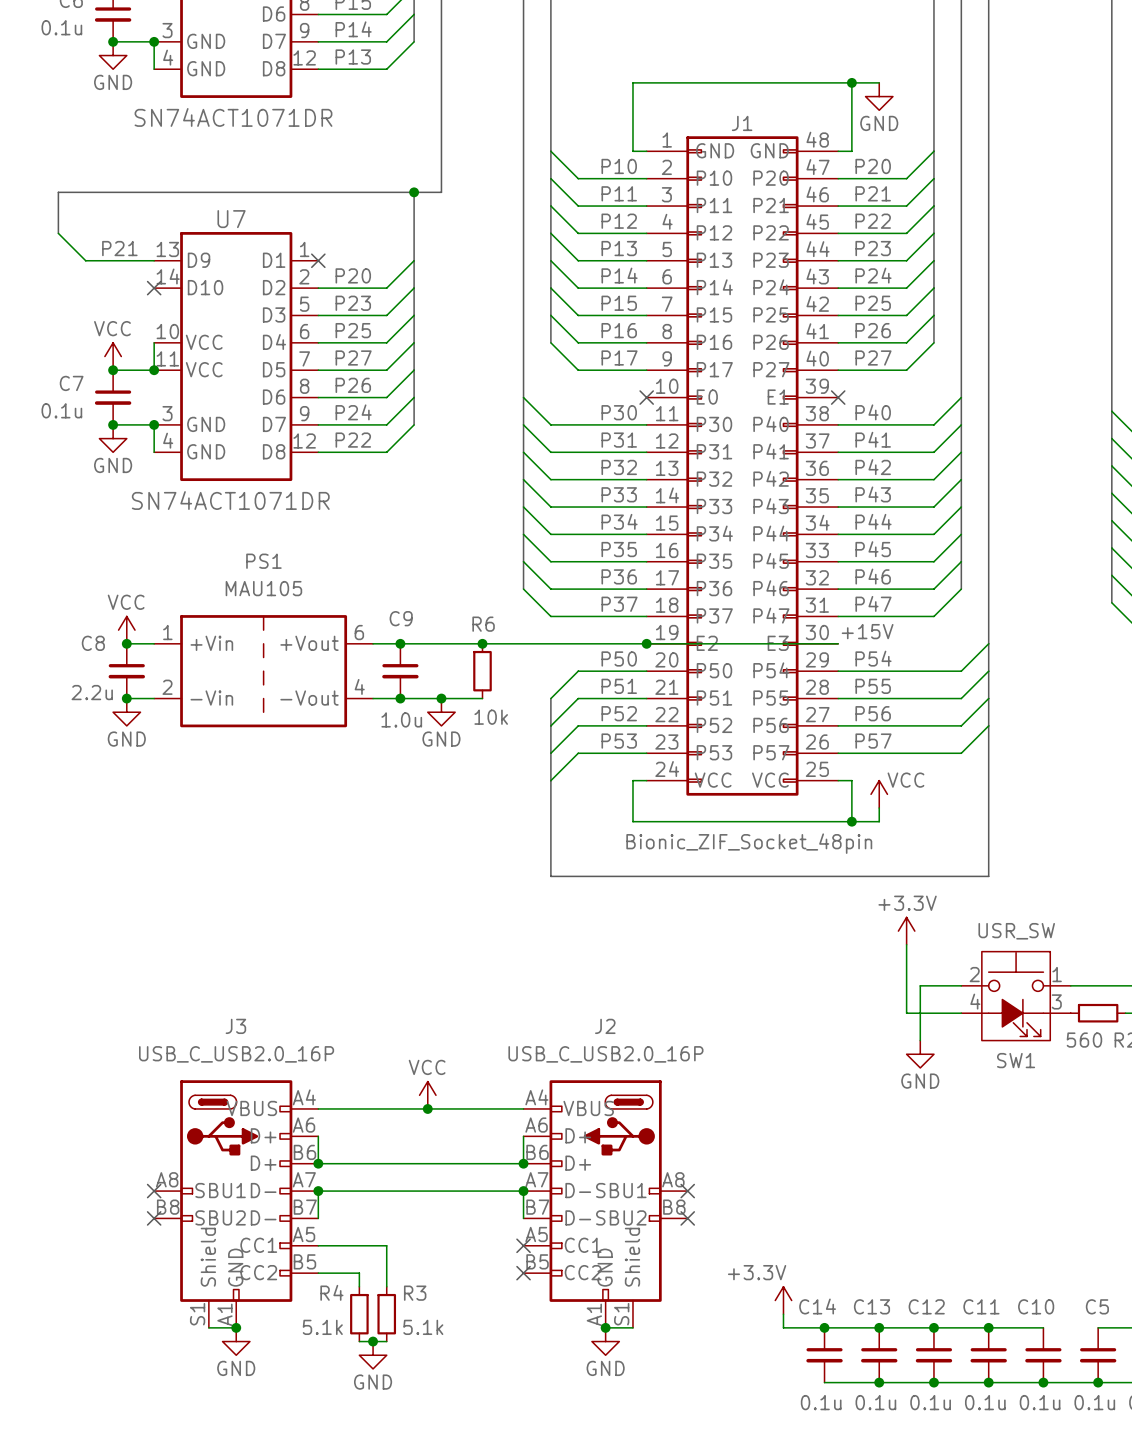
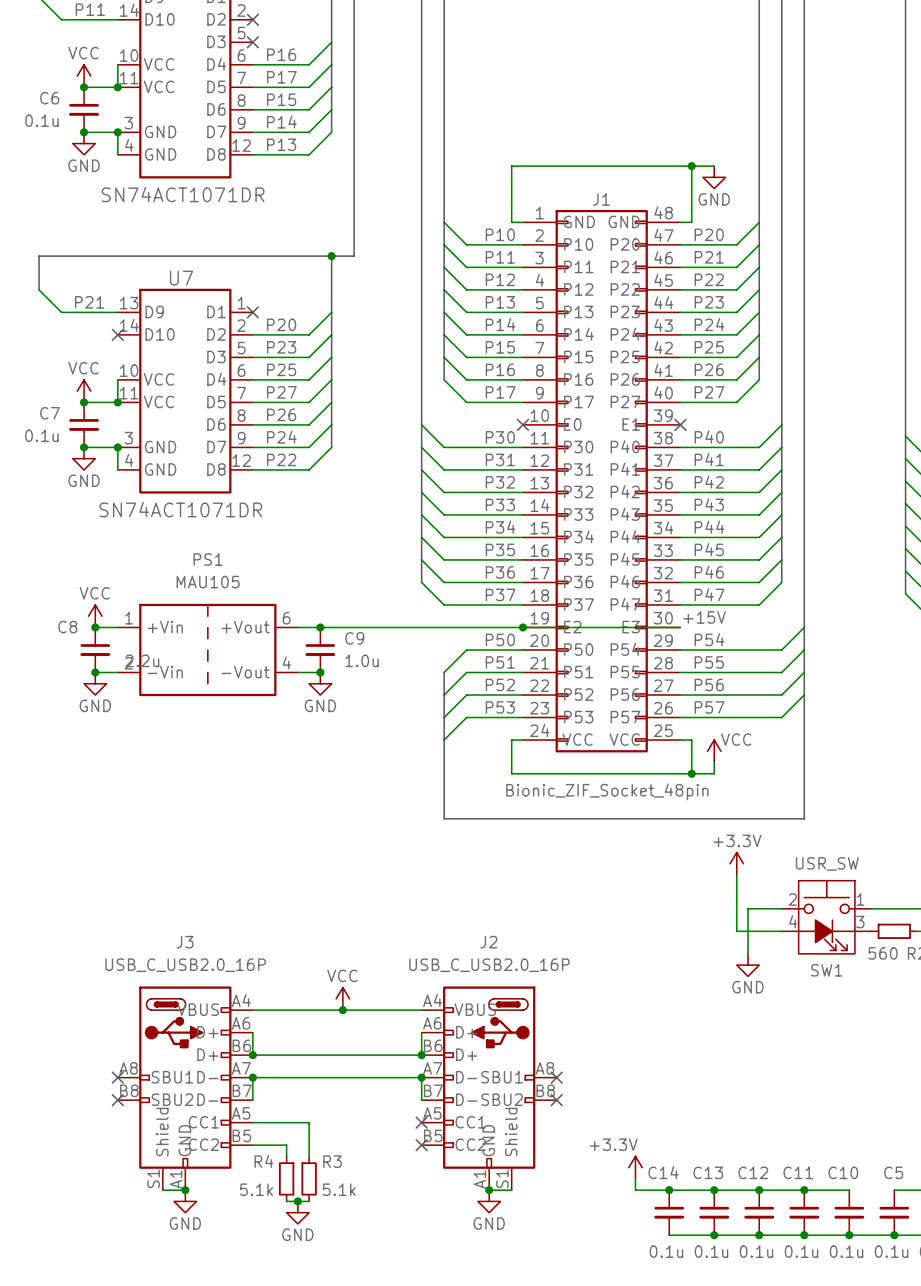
C9 name position: C9 (401, 618) -> C9 (354, 638)
junction: (482, 643) -> none
R6: 10k (482, 671) -> none
C8 value position: 2.2u (92, 692) -> 2.2u (142, 660)
wire: (400, 698) (482, 698) -> none
junction: (441, 698) -> none
power symbol position: GND (441, 712) -> GND (320, 683)
C9 value position: 1.0u (401, 719) -> 1.0u (361, 660)

